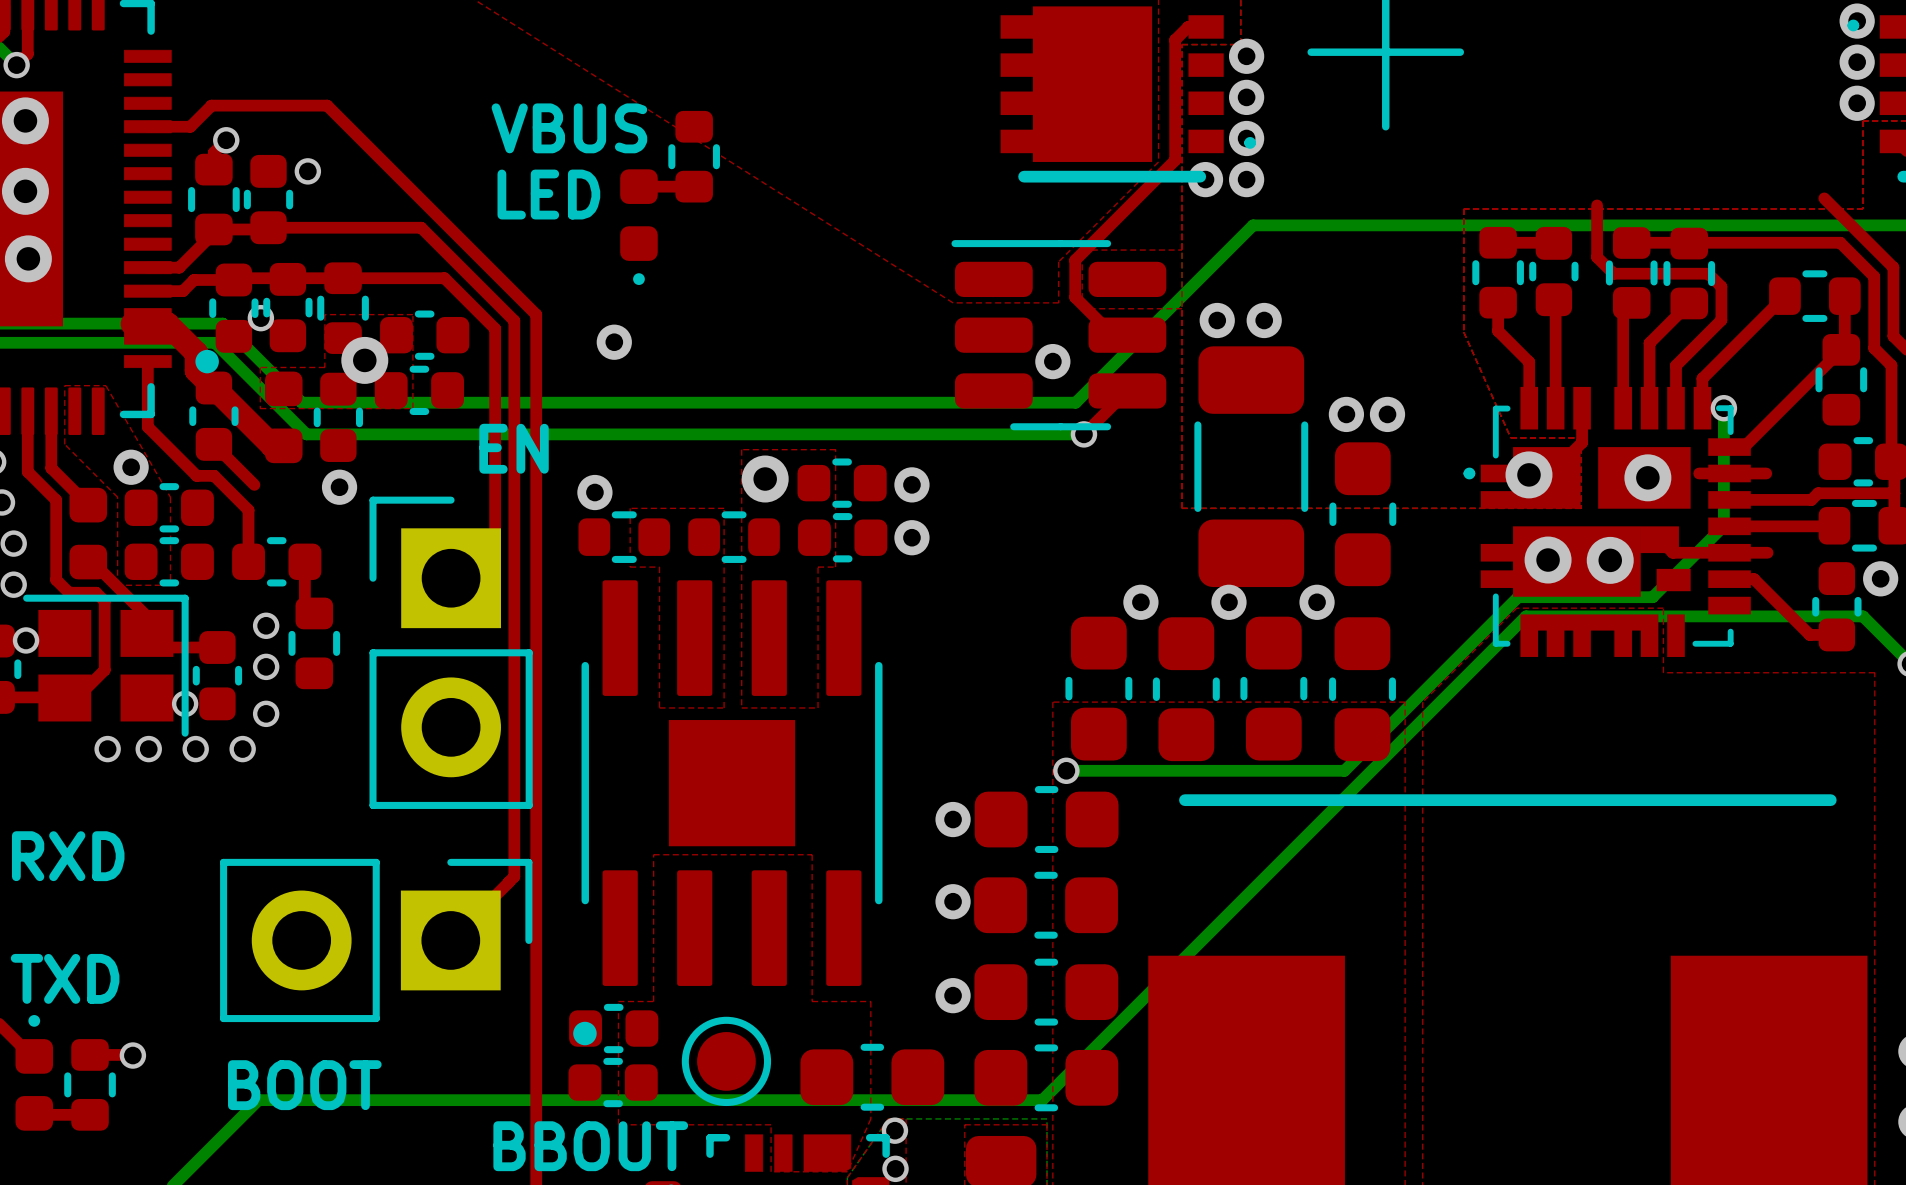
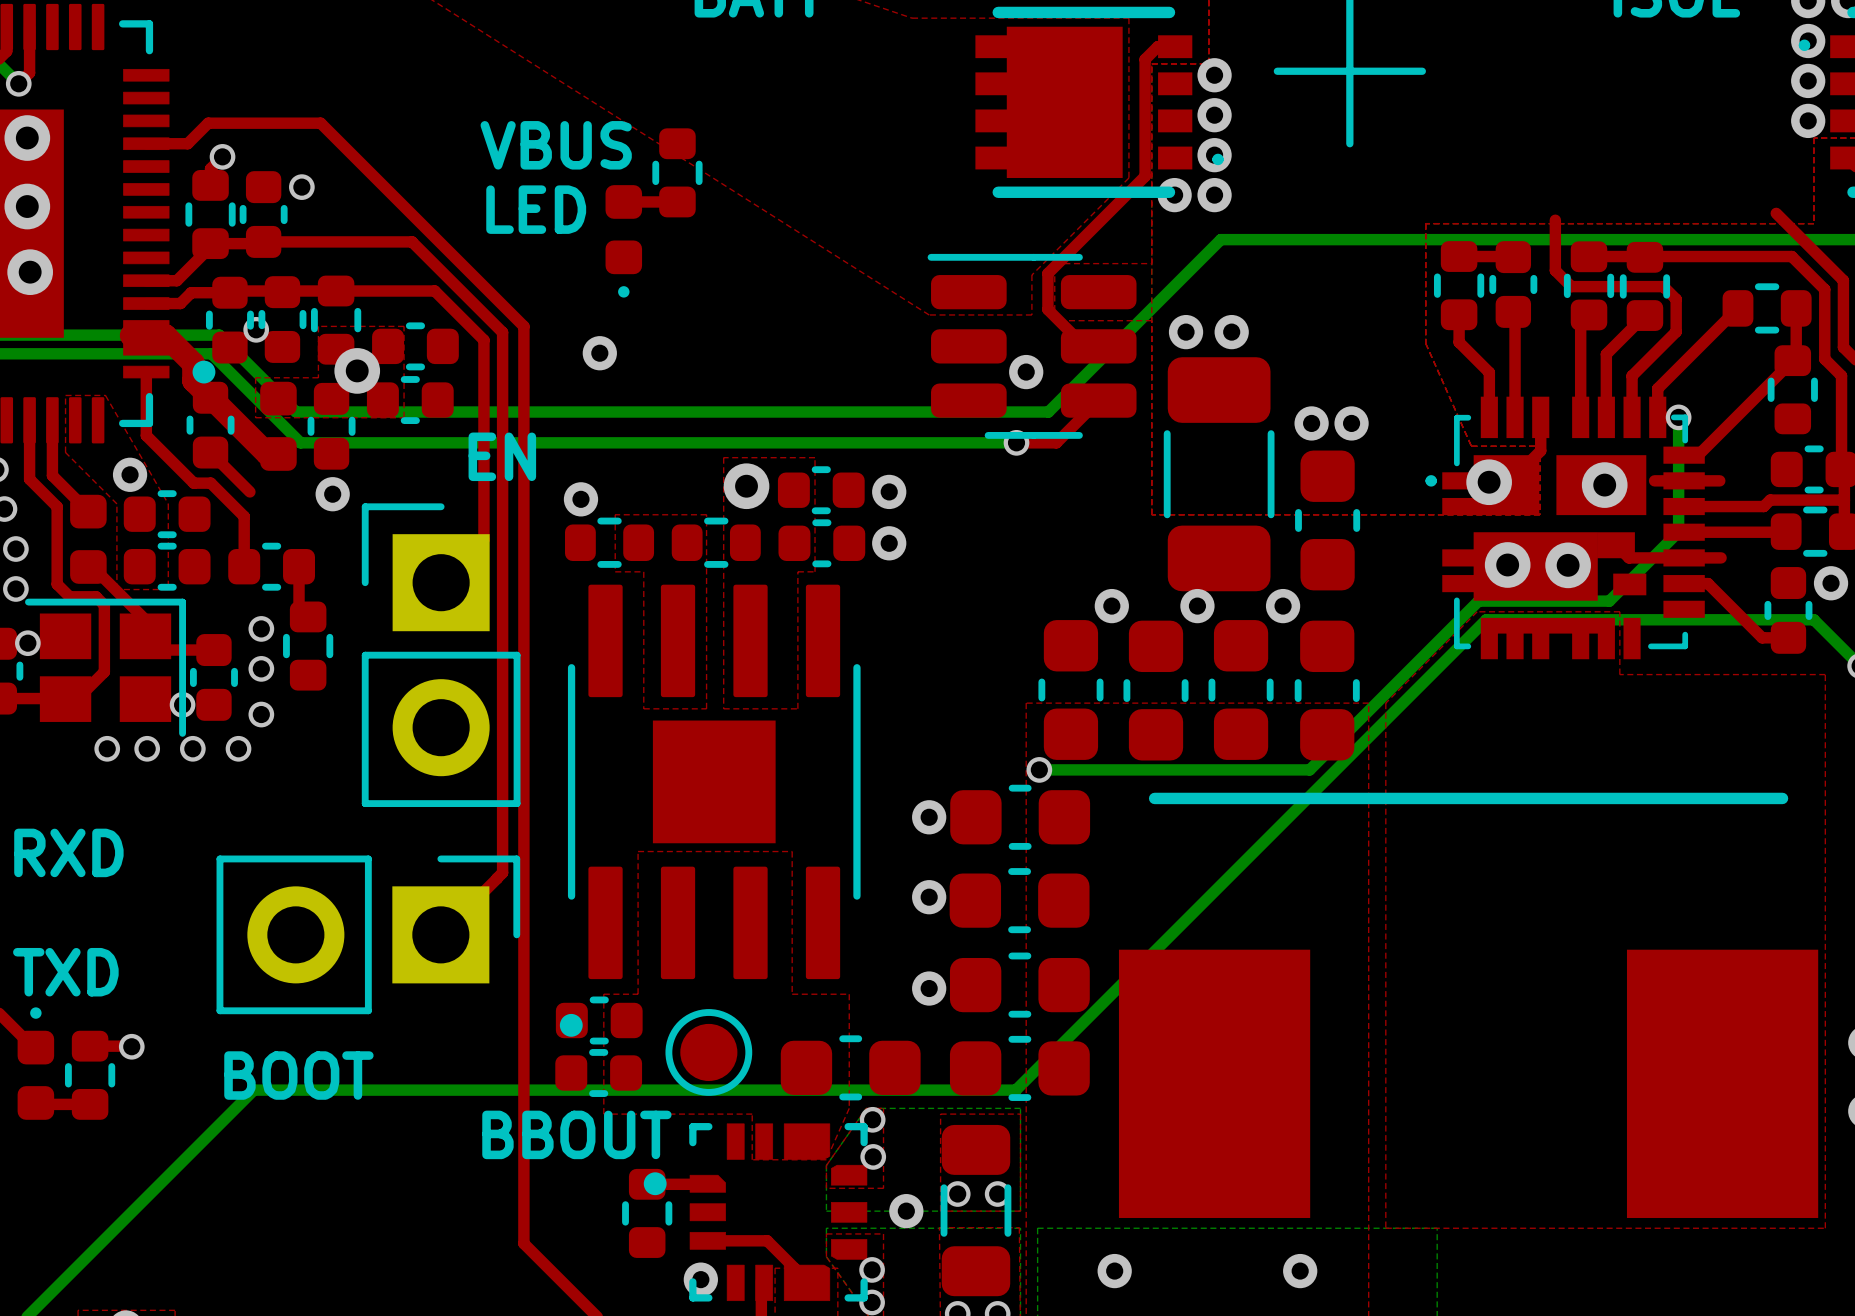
top track: none -> (1016, 442) (1056, 442)
bottom track: (1042, 434) (1083, 434) -> none
via position: (1083, 434) -> (1016, 442)

